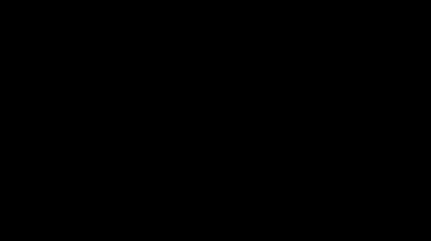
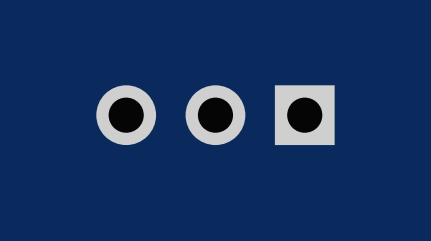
part: none -> (215, 115)

